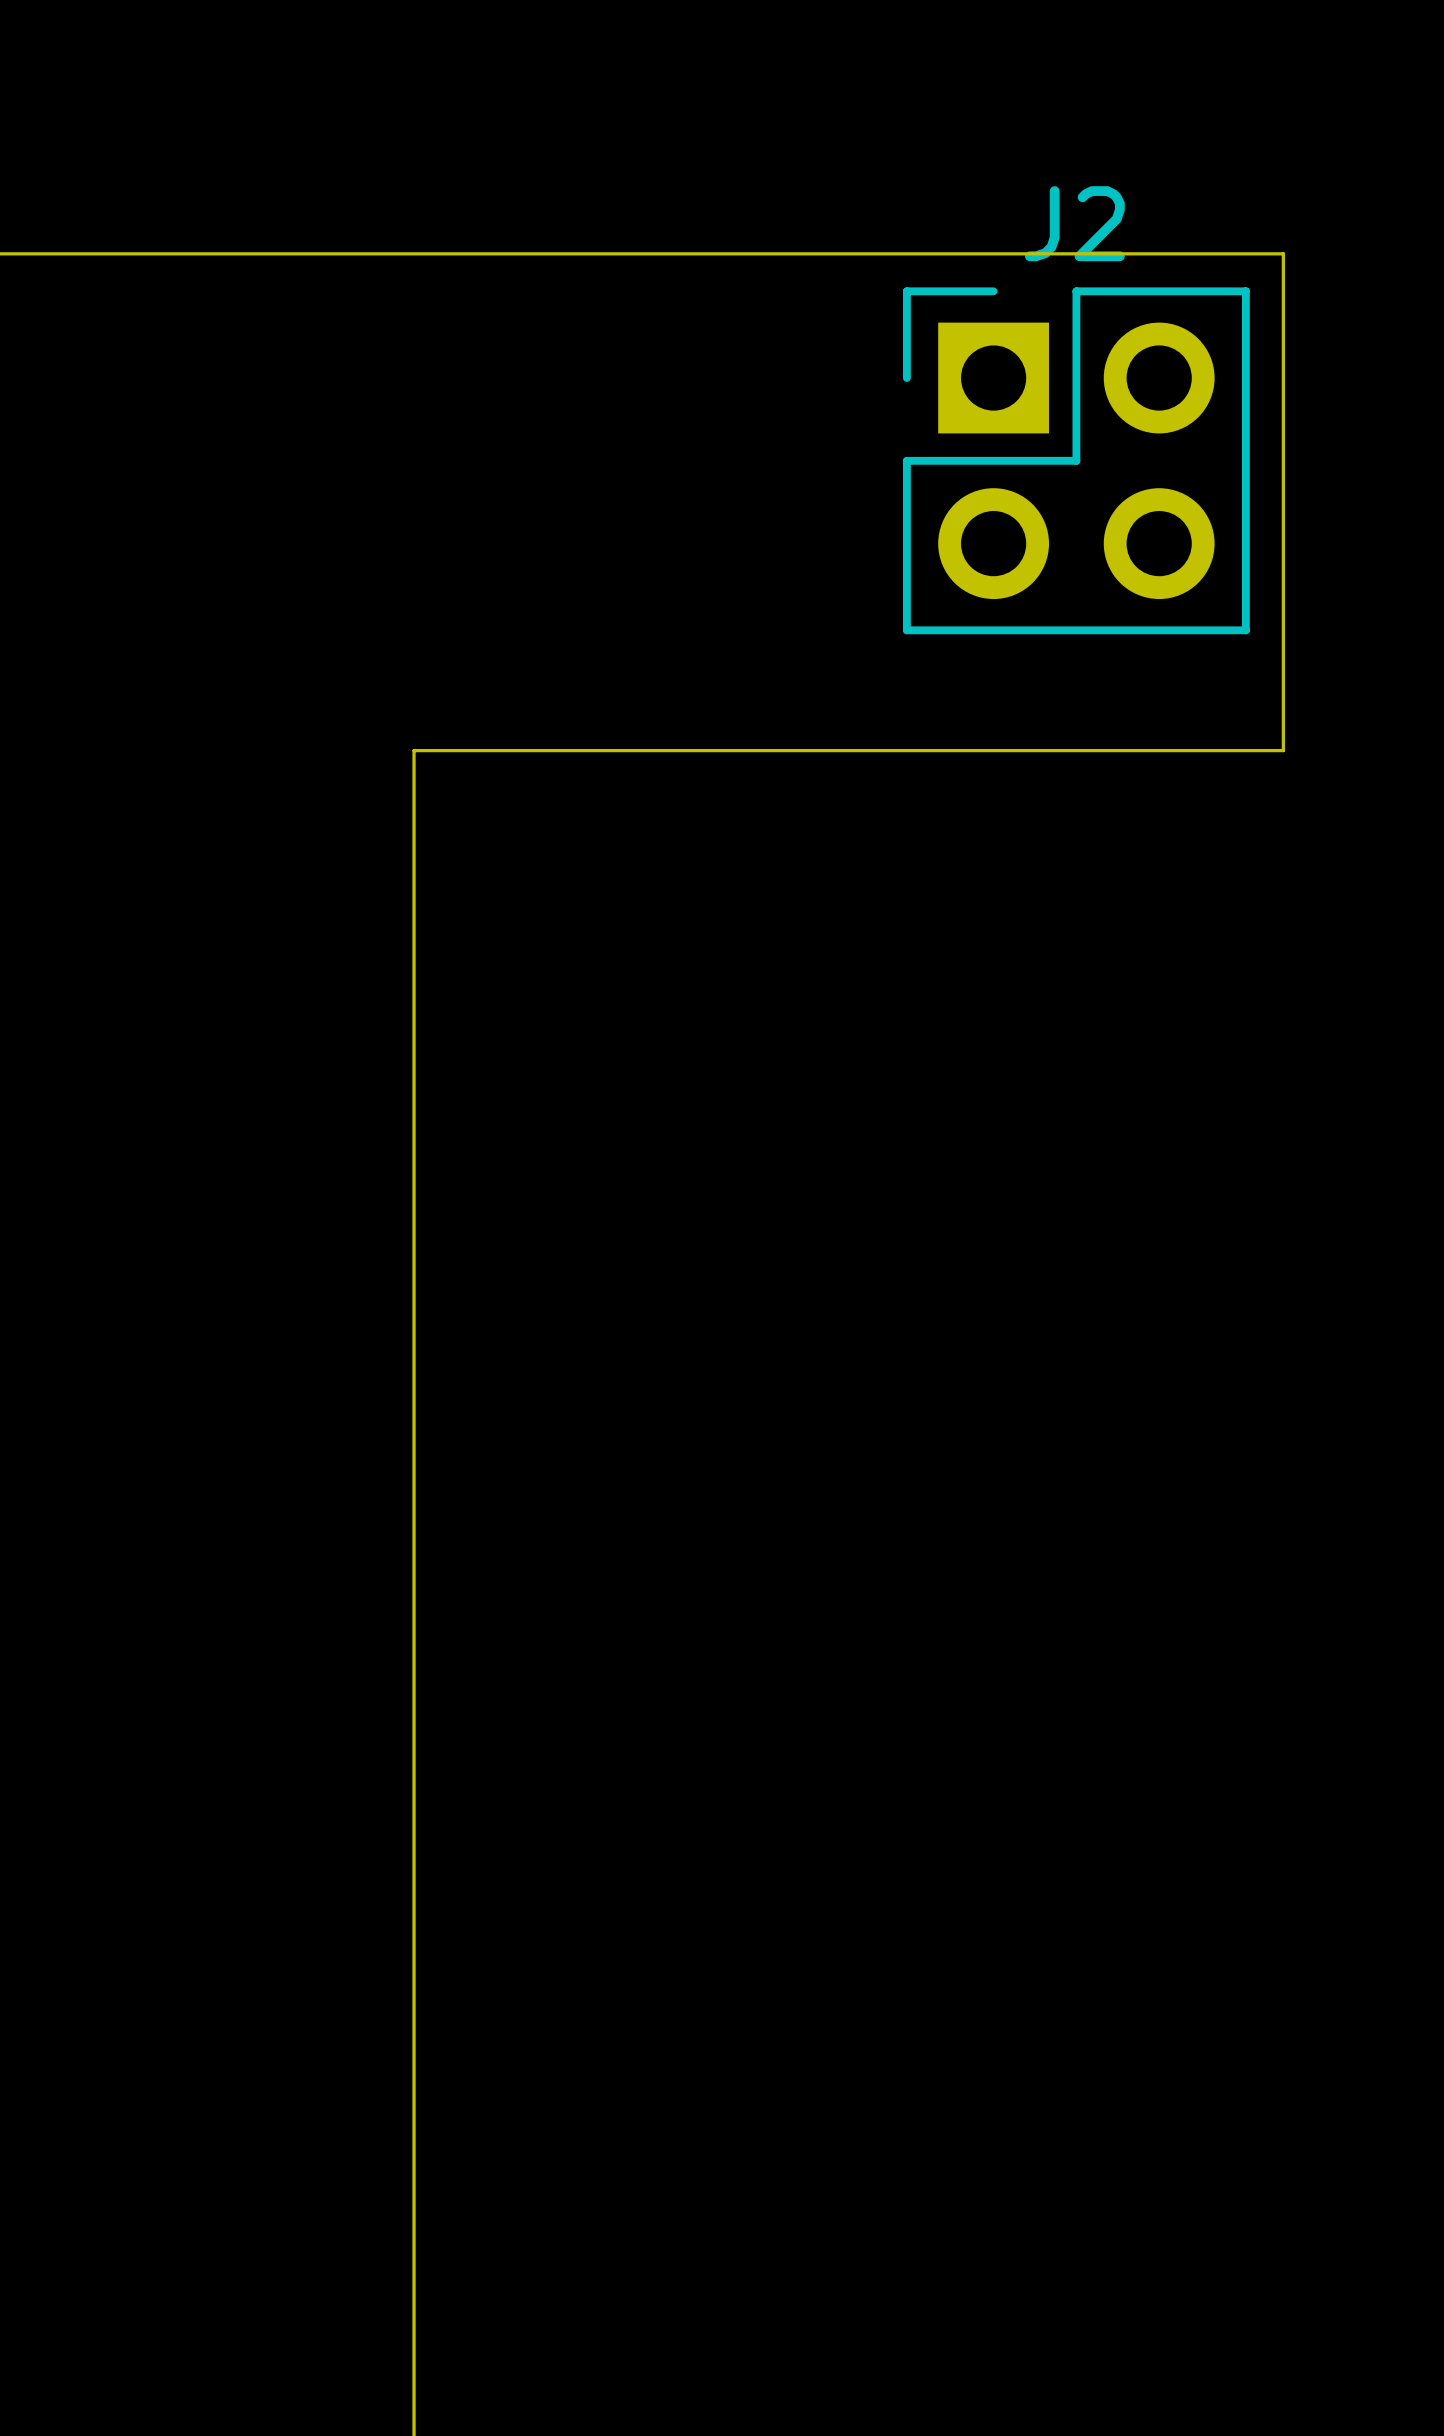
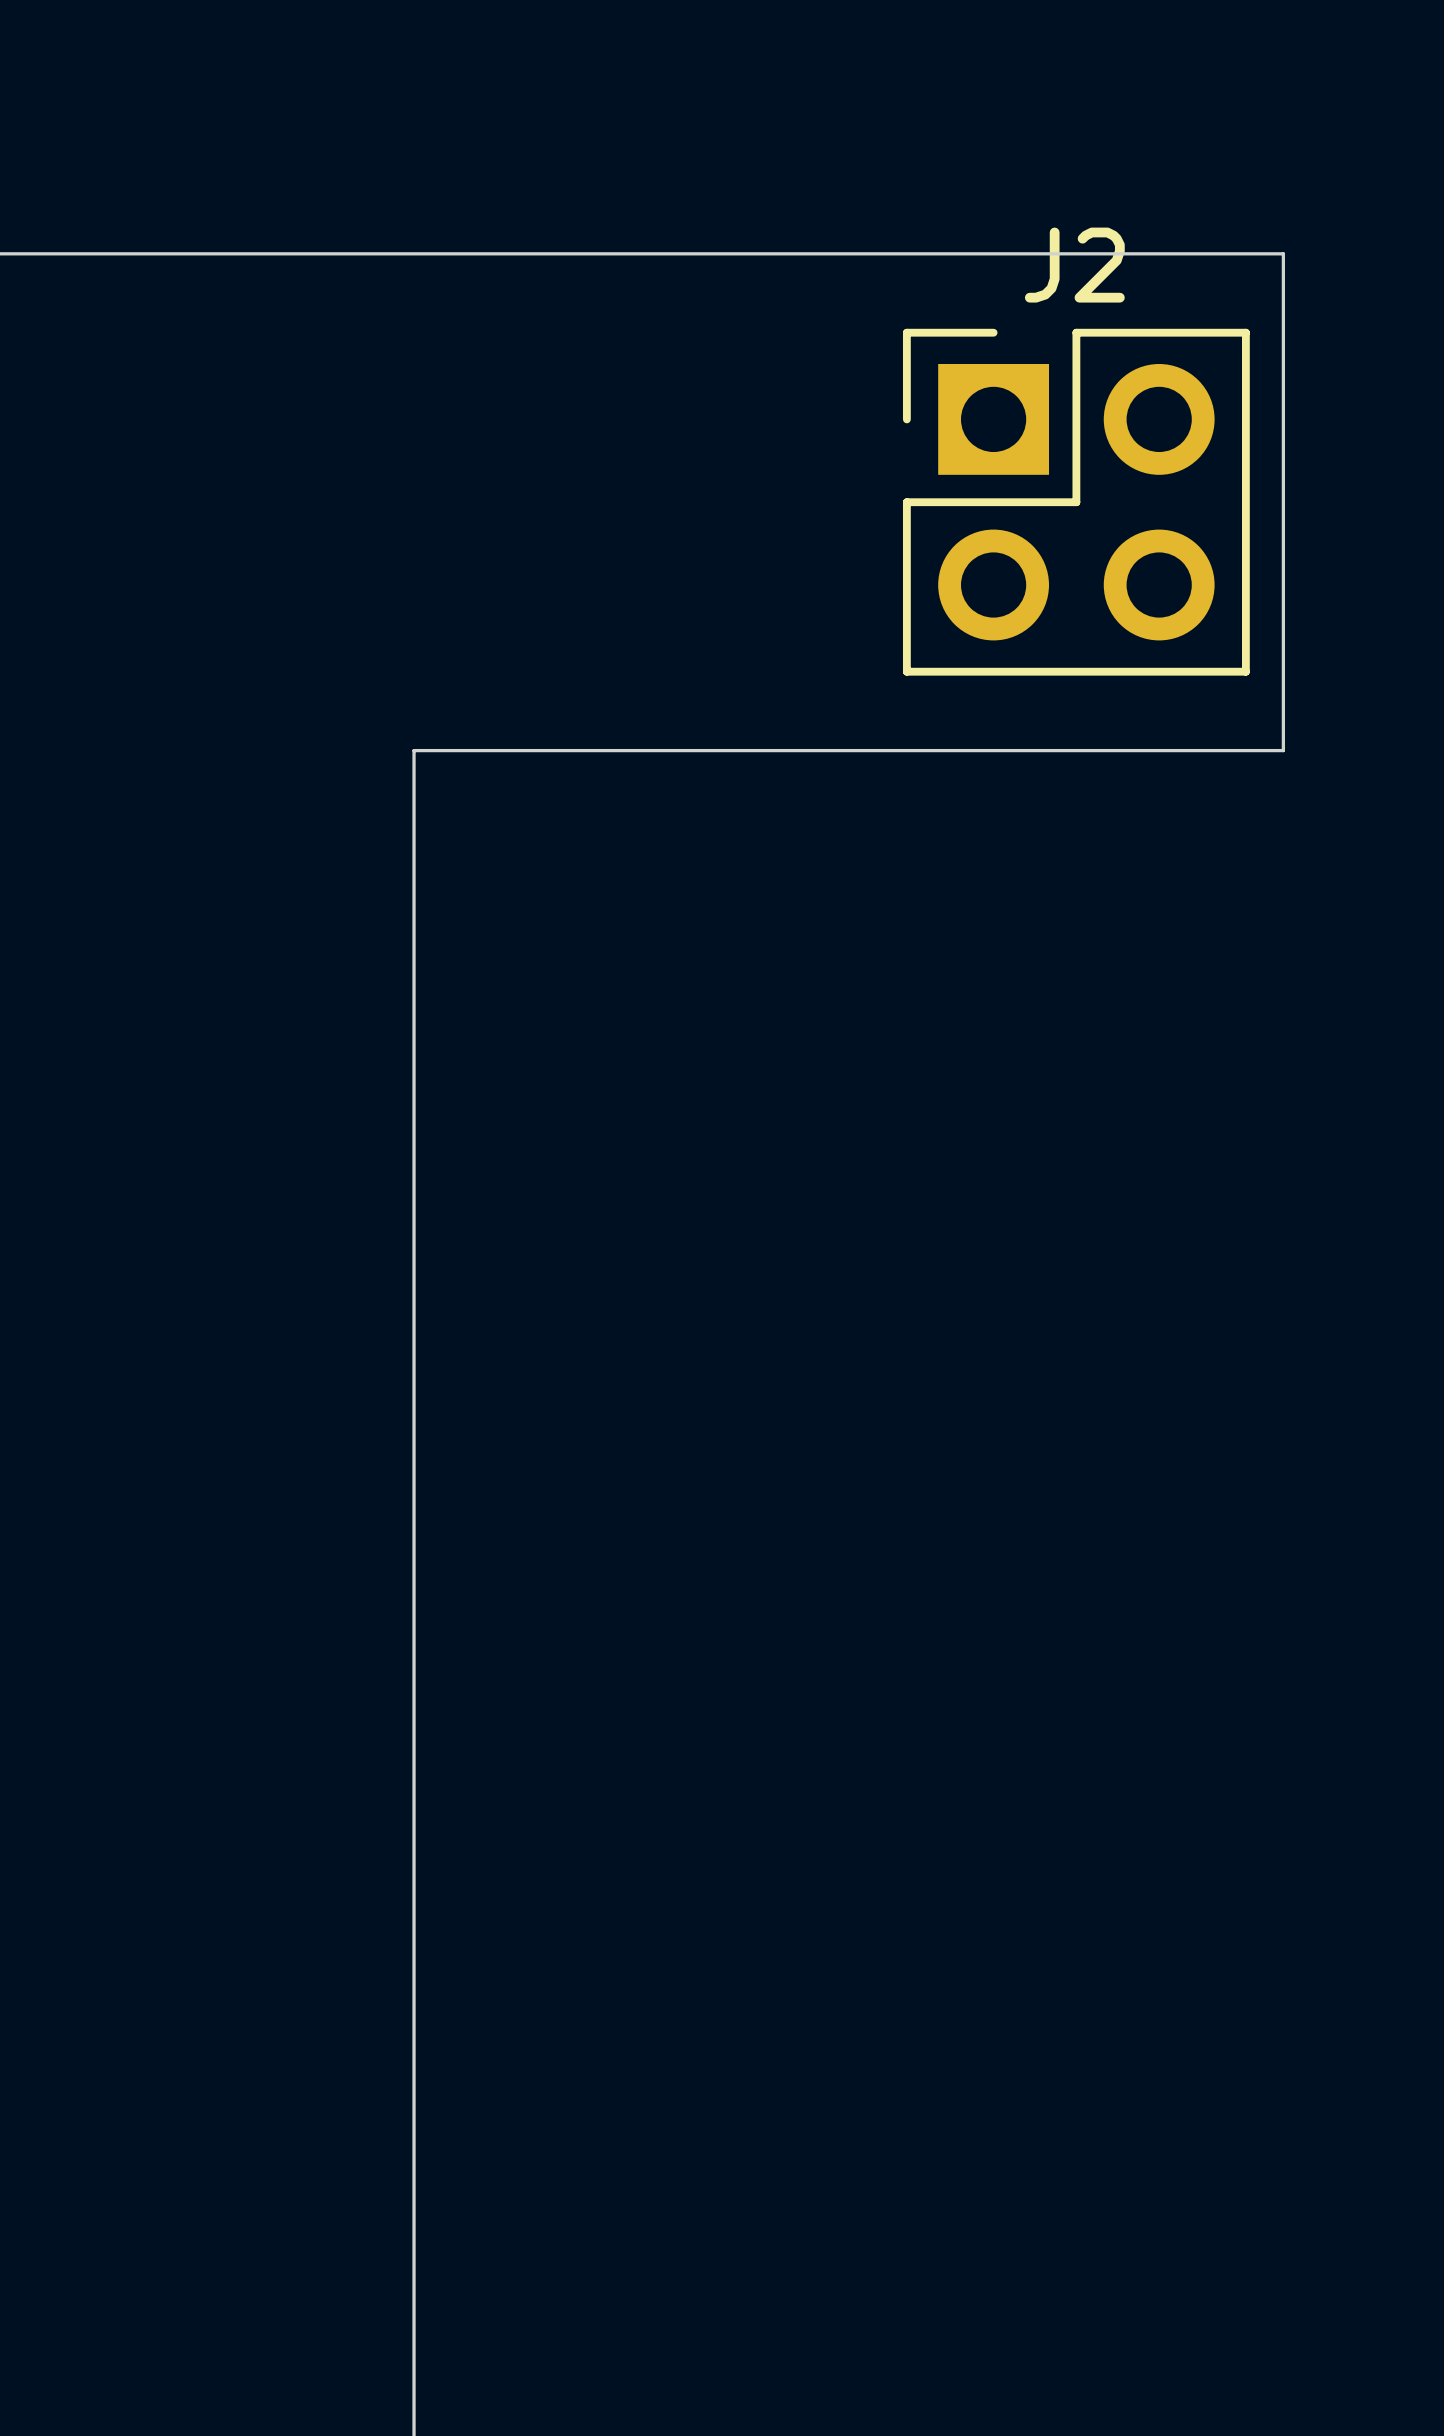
J2 position: (1076, 460) -> (1076, 502)

